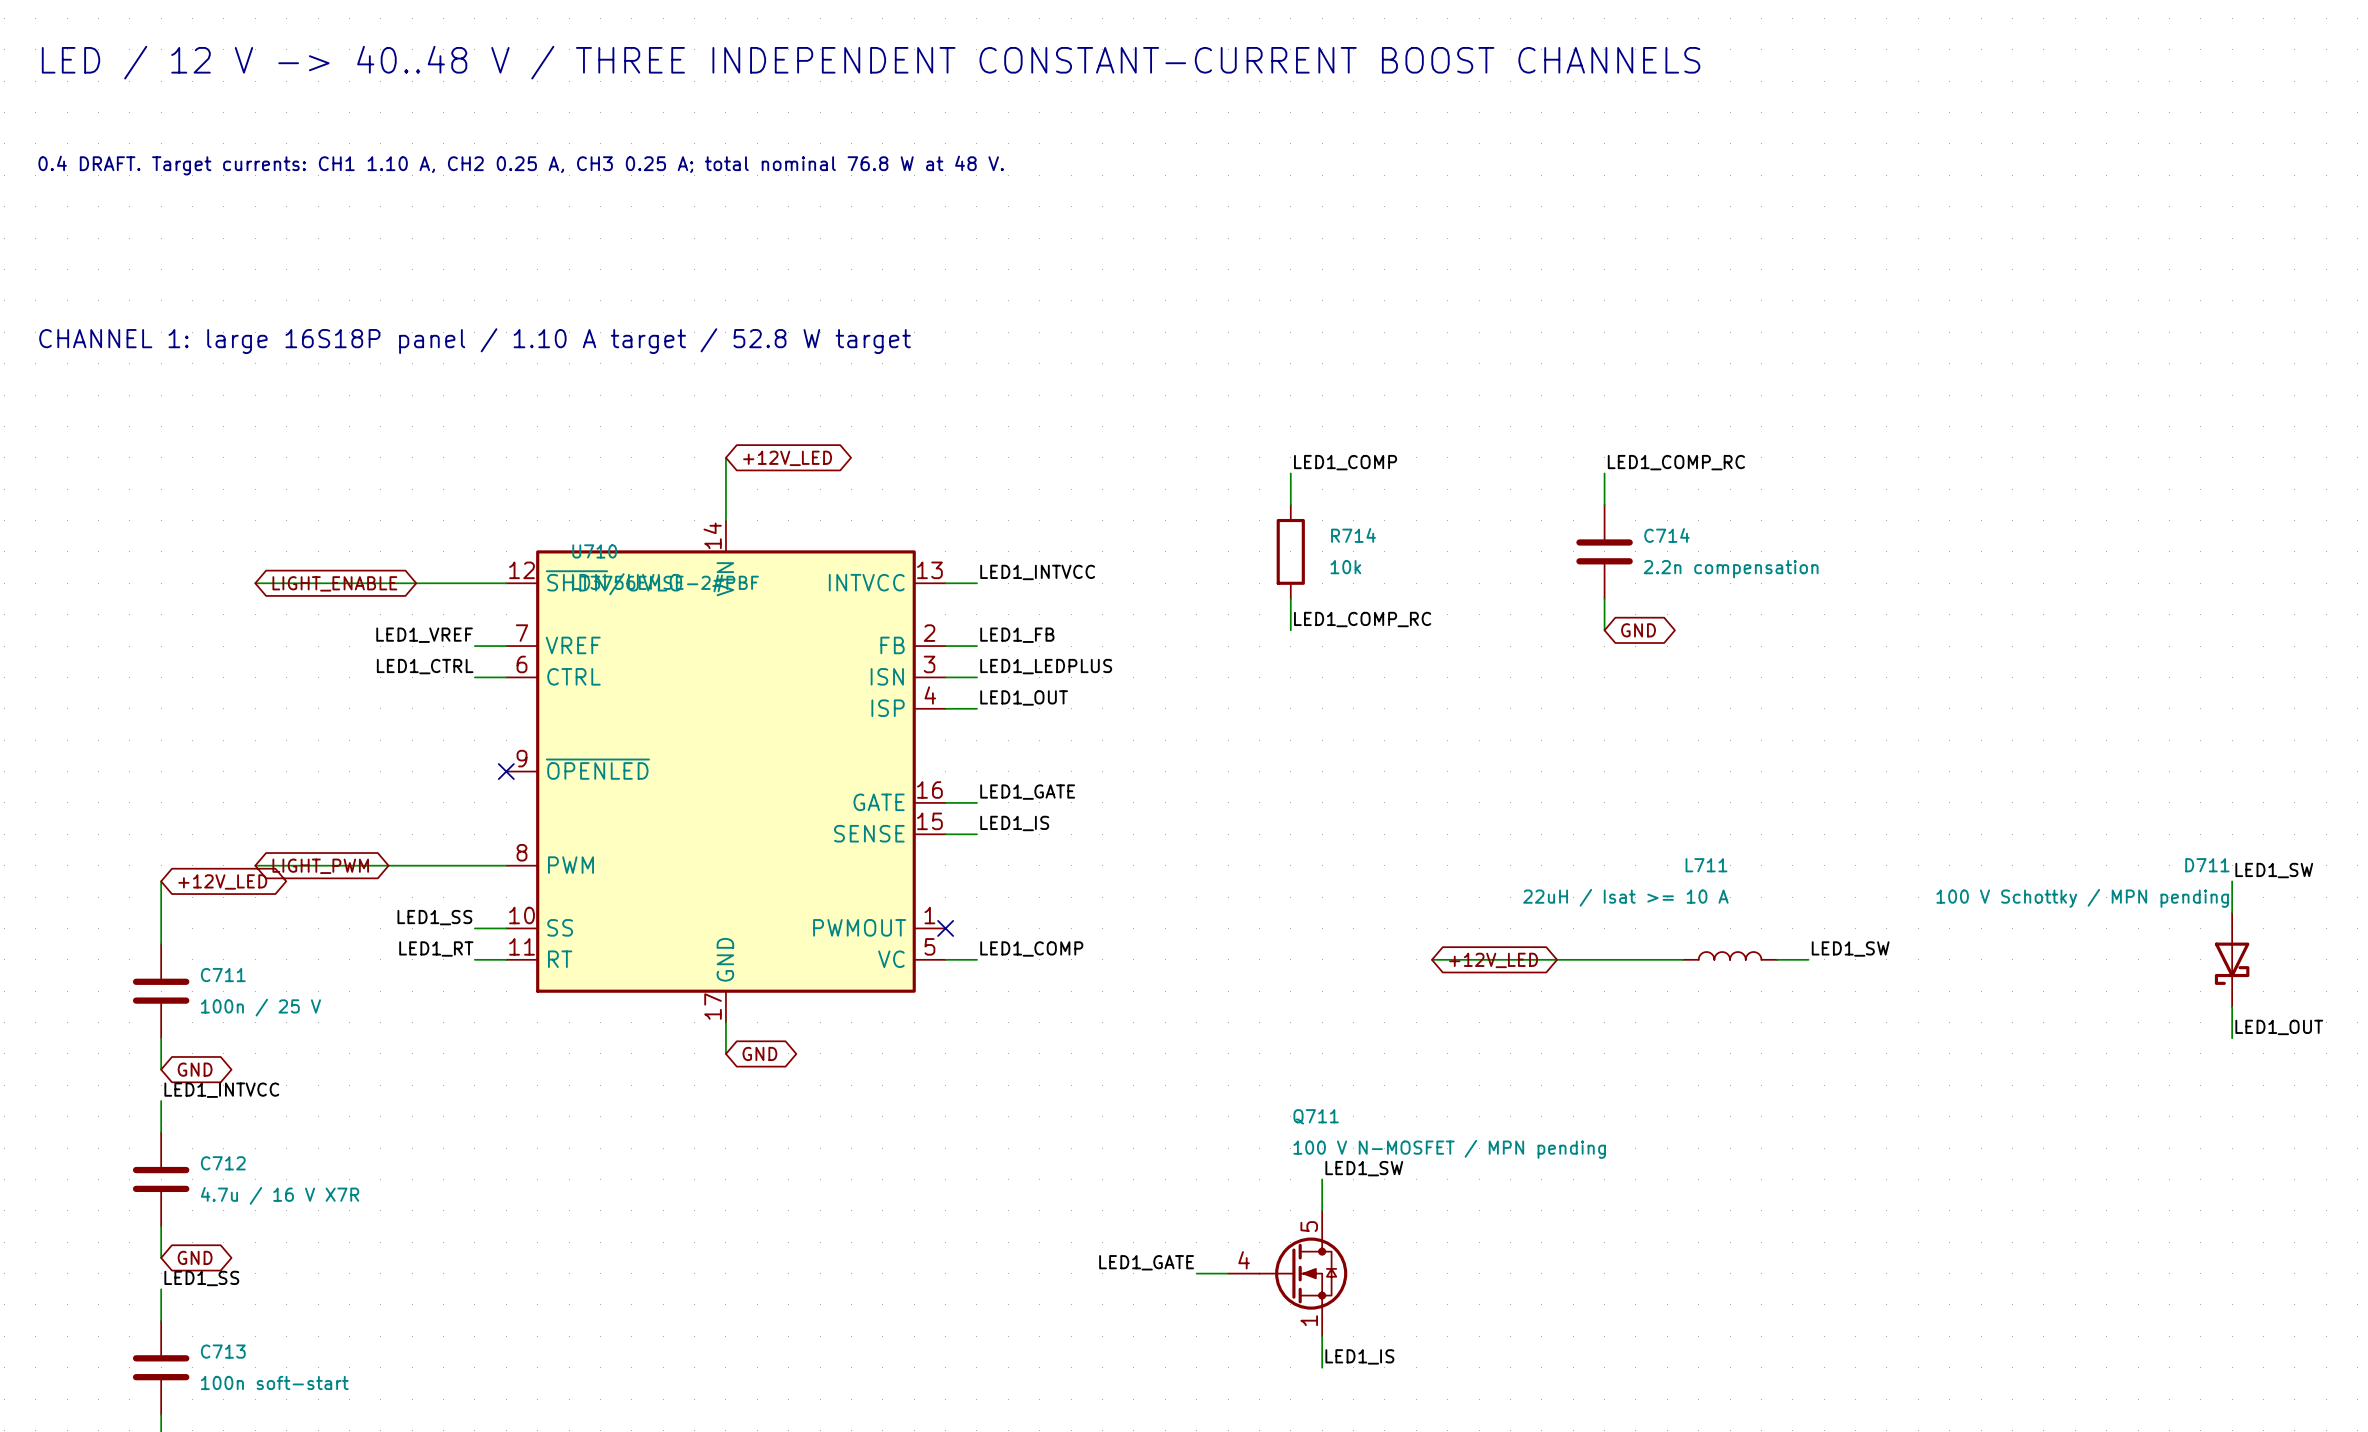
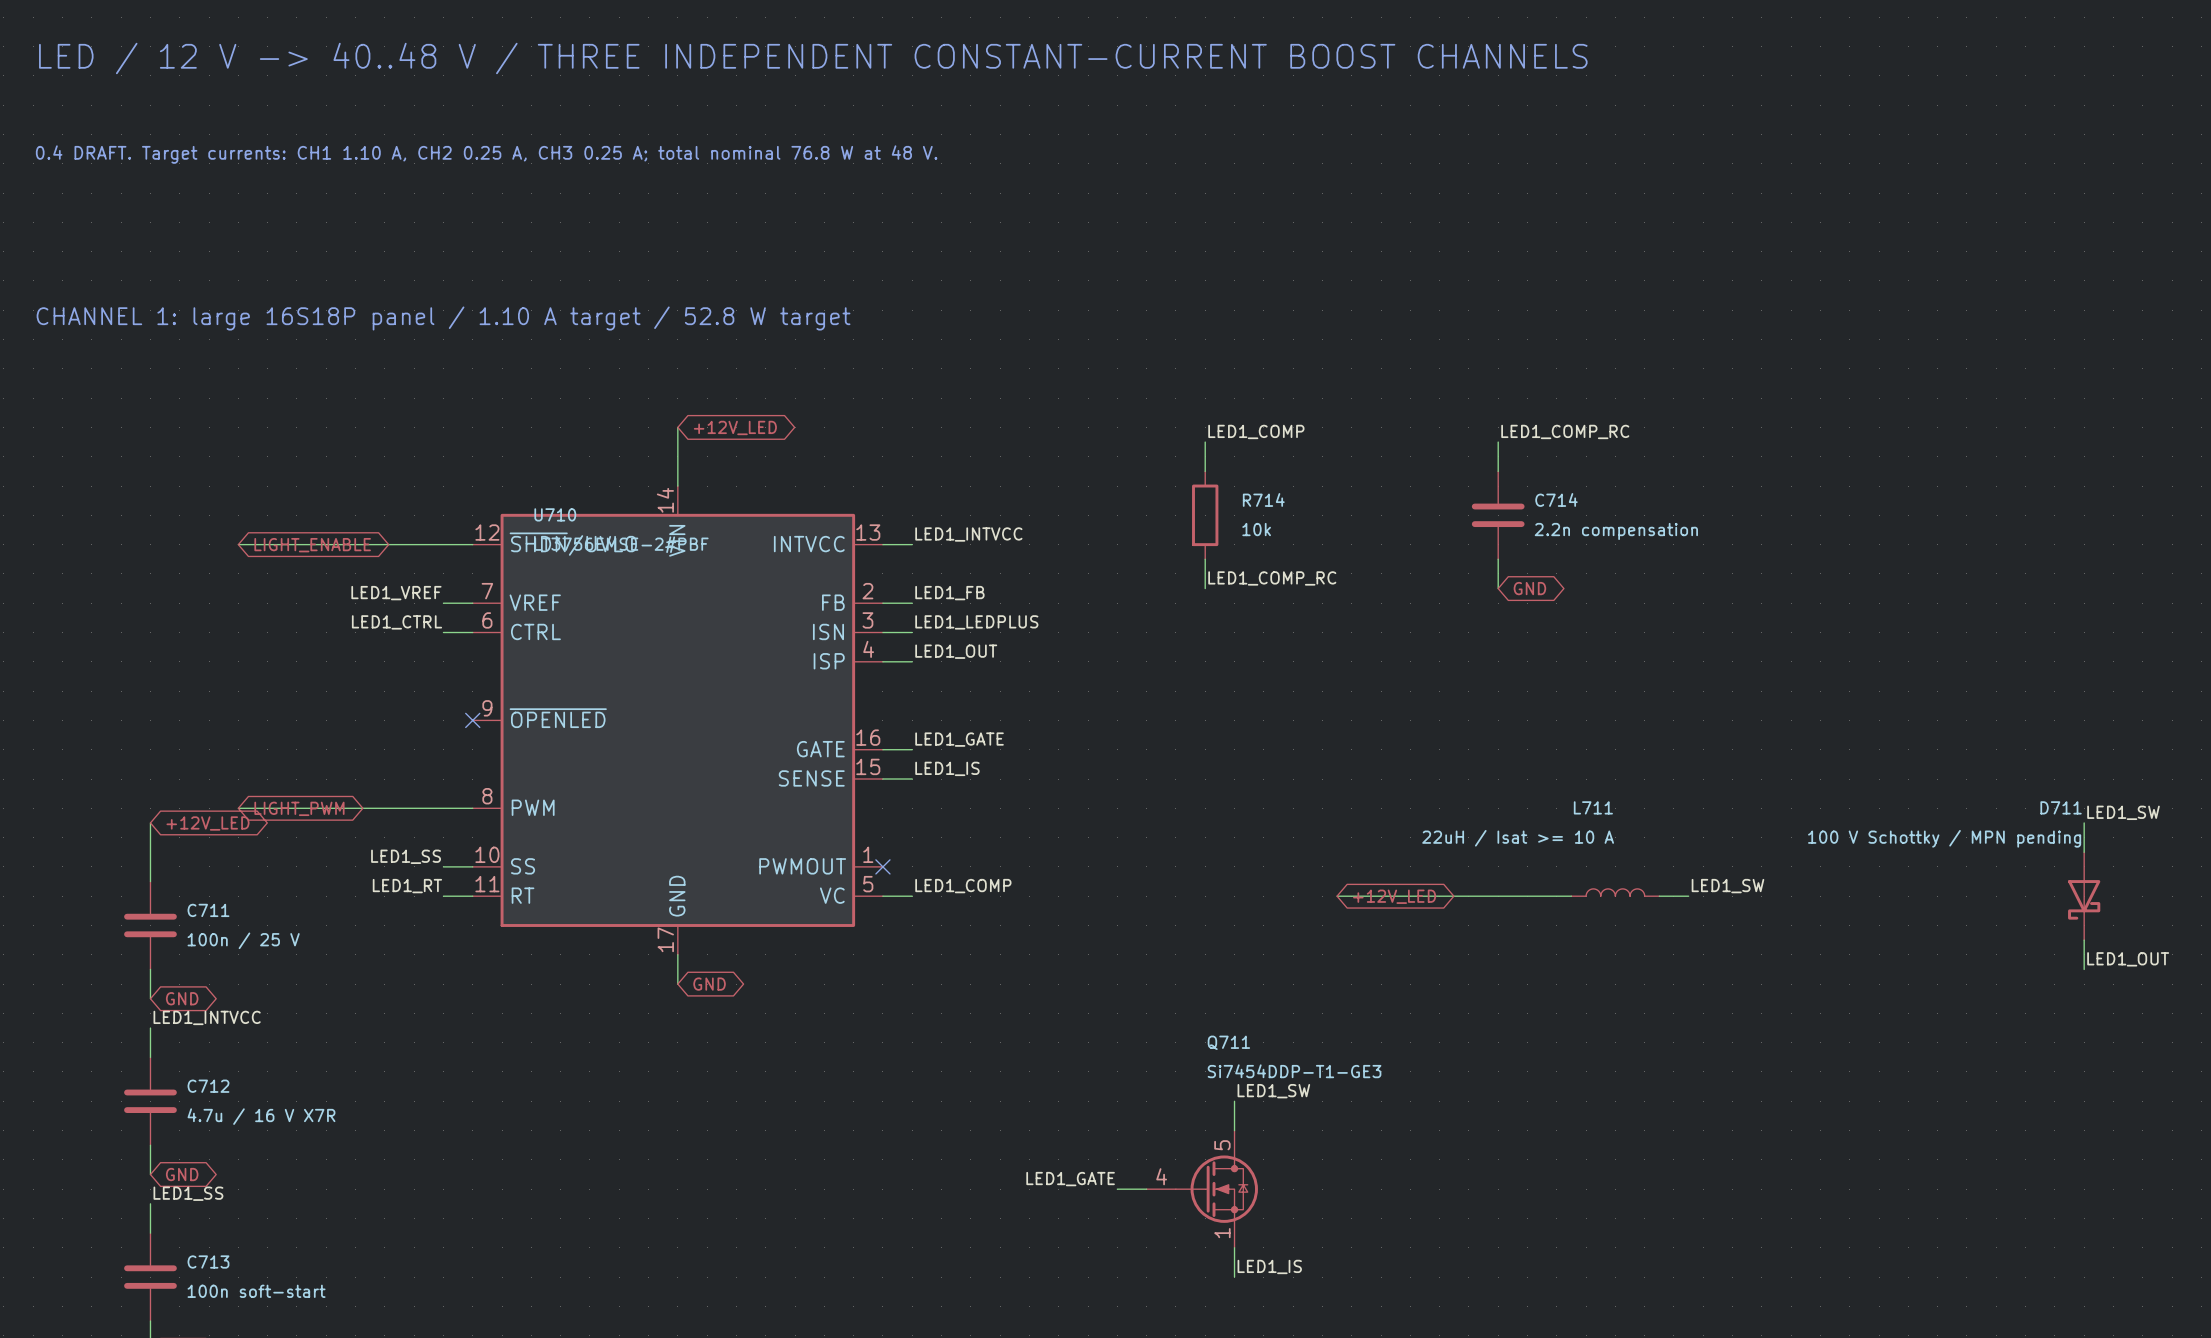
Q711 value: 100 V N-MOSFET / MPN pending (1449, 1149) -> Si7454DDP-T1-GE3 (1294, 1071)

